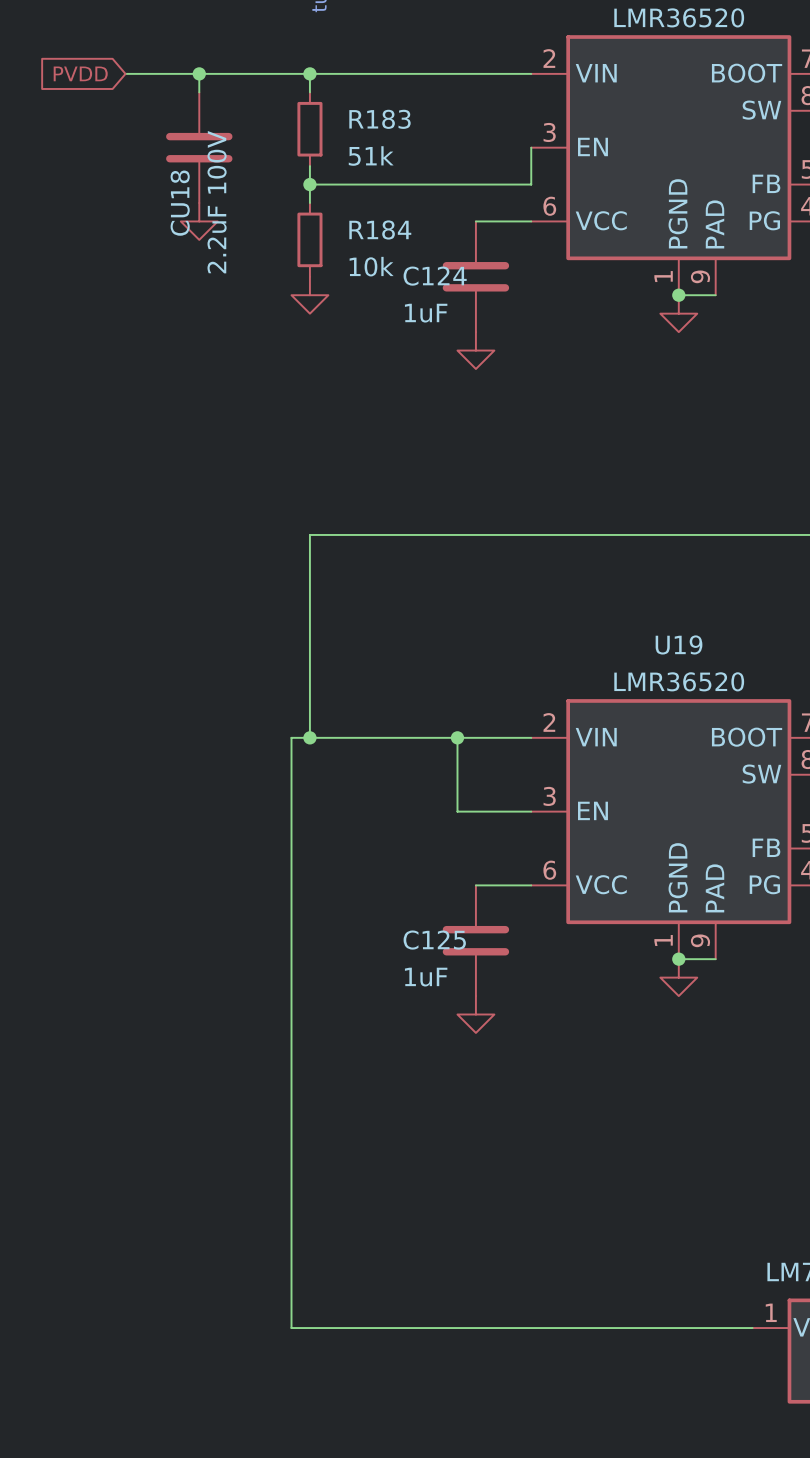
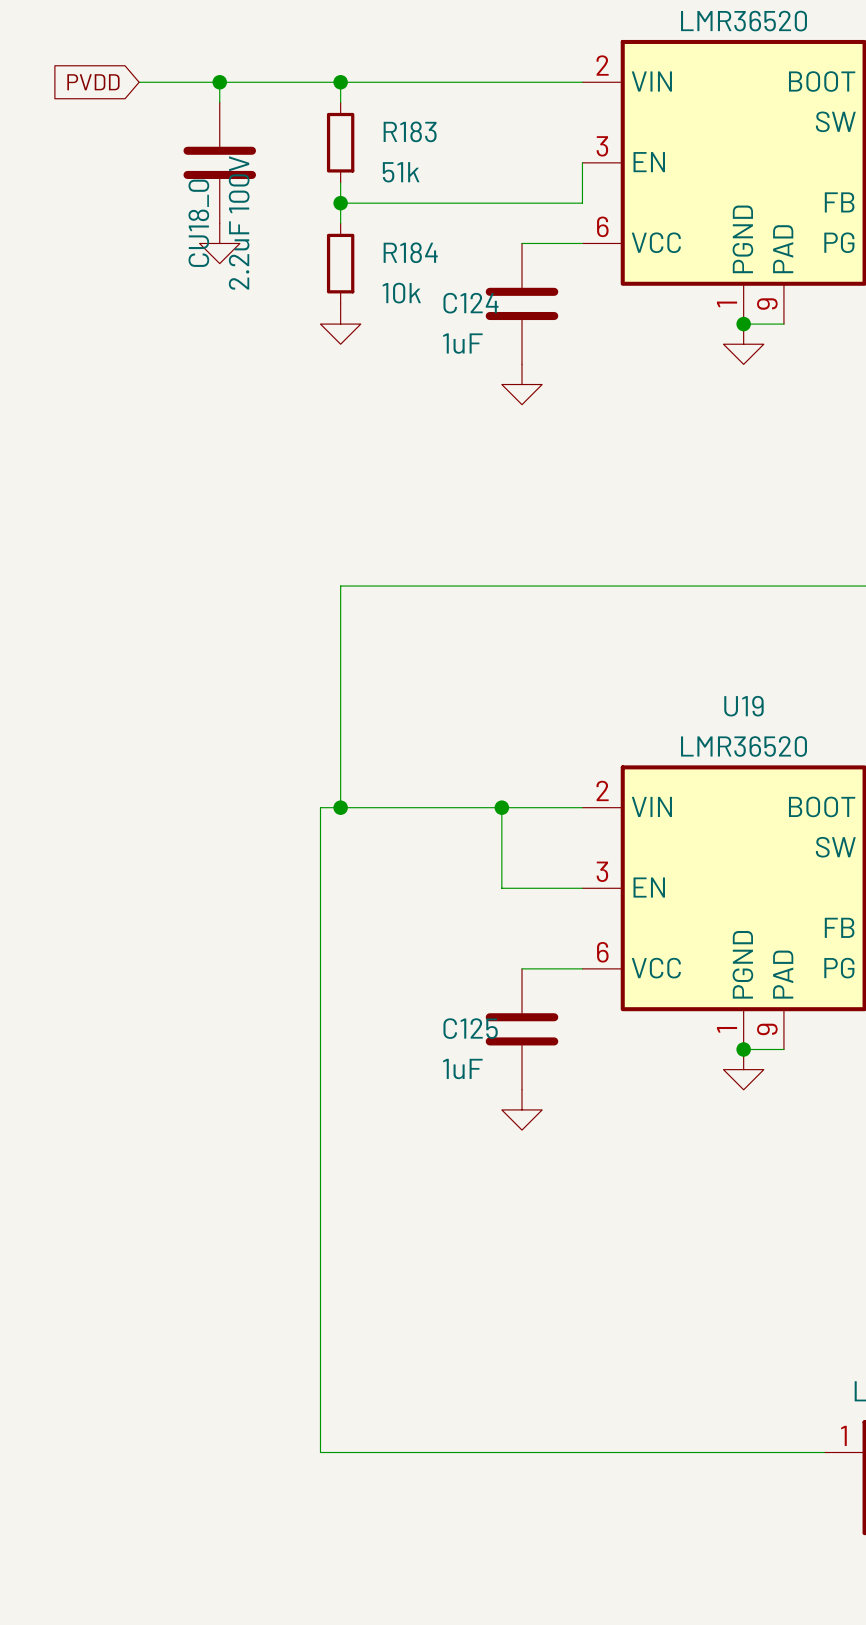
CU18 name: CU18 (180, 203) -> CU18_0 (198, 223)

